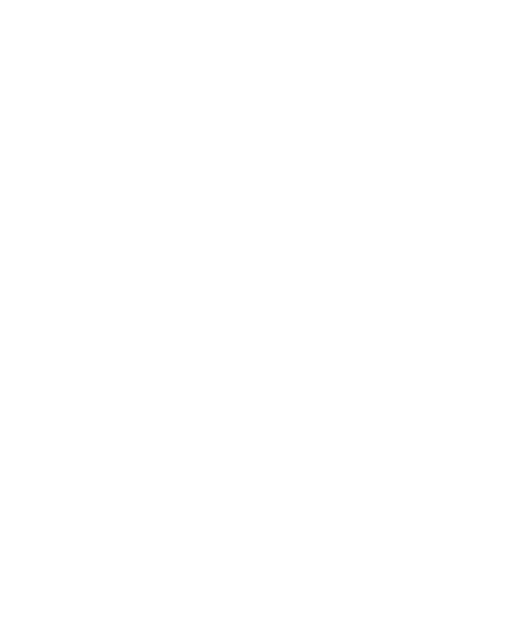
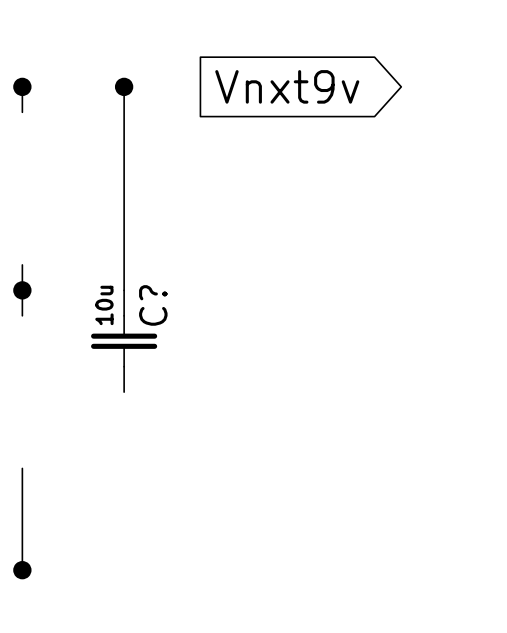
wire: none -> (22, 86) (22, 112)
junction: none -> (22, 86)
wire: none -> (124, 86) (124, 290)
junction: none -> (124, 86)
global label: none -> Vnxt9v (287, 86)
wire: none -> (22, 264) (22, 315)
junction: none -> (22, 290)
C?: none -> 10u (124, 341)
wire: none -> (22, 468) (22, 570)
junction: none -> (22, 570)

